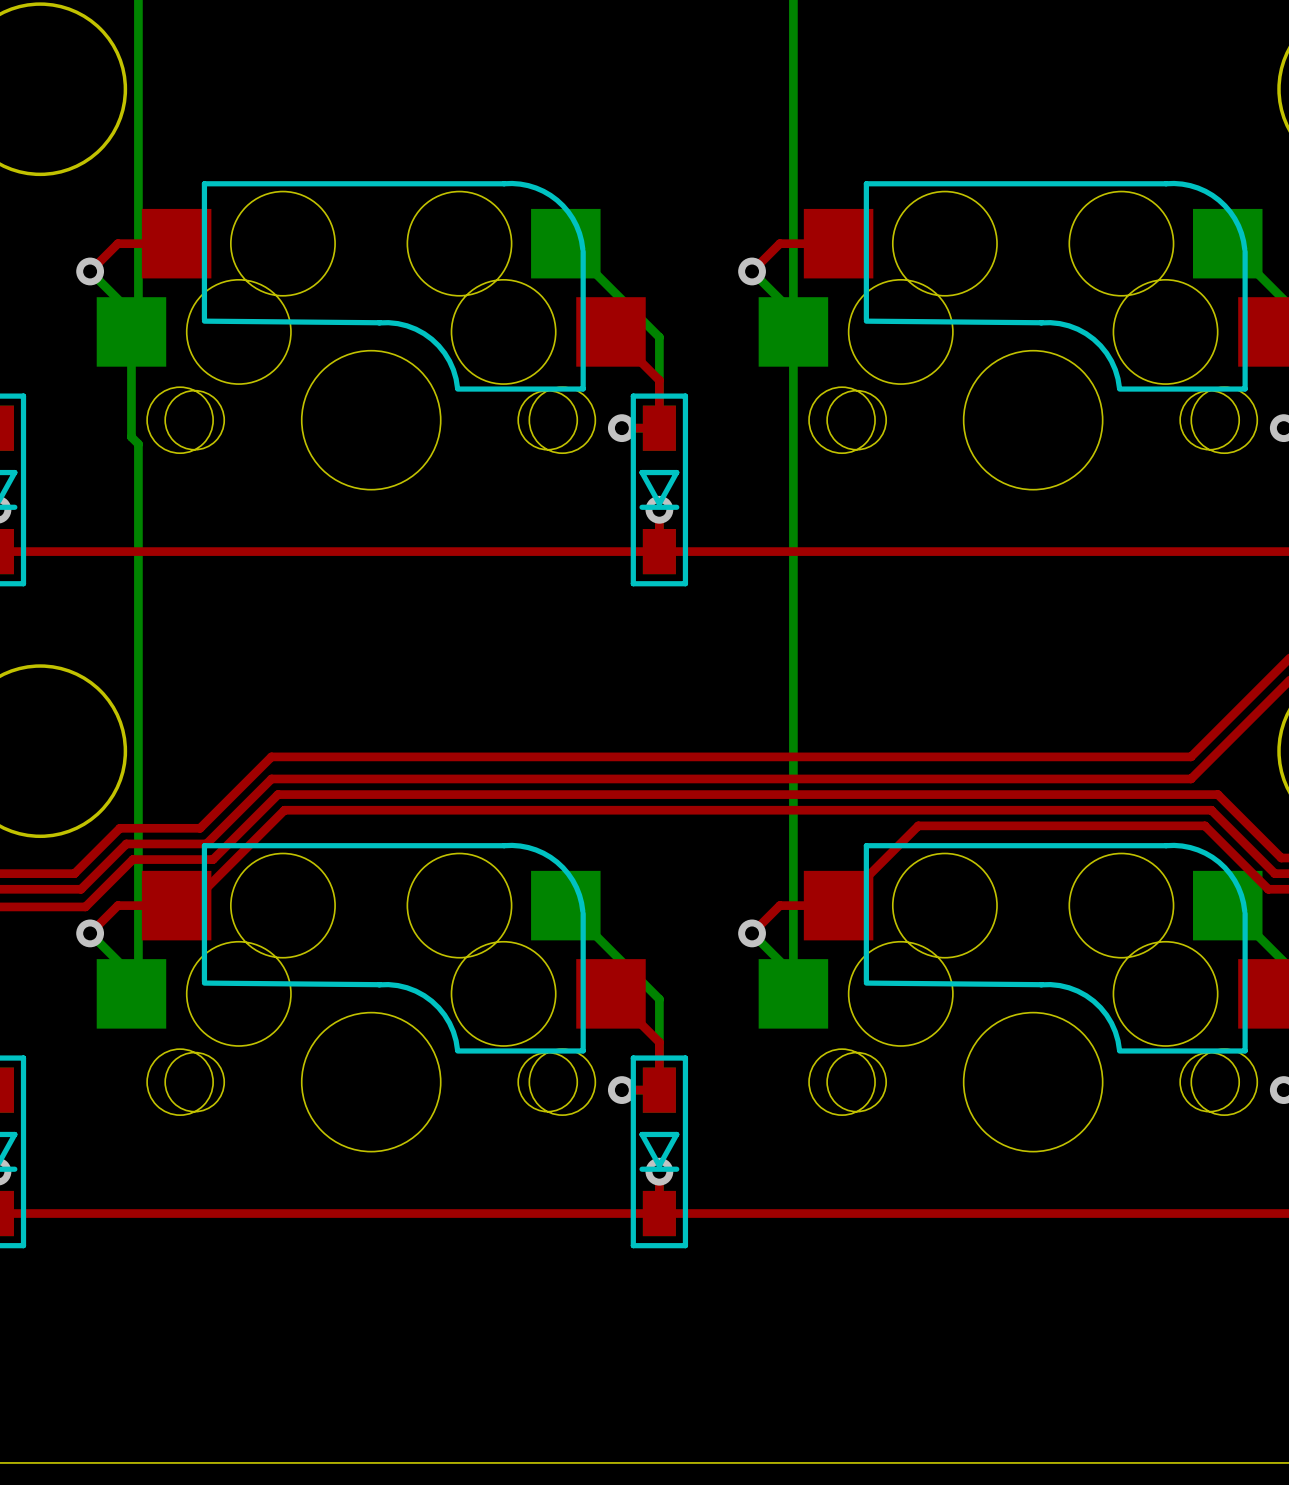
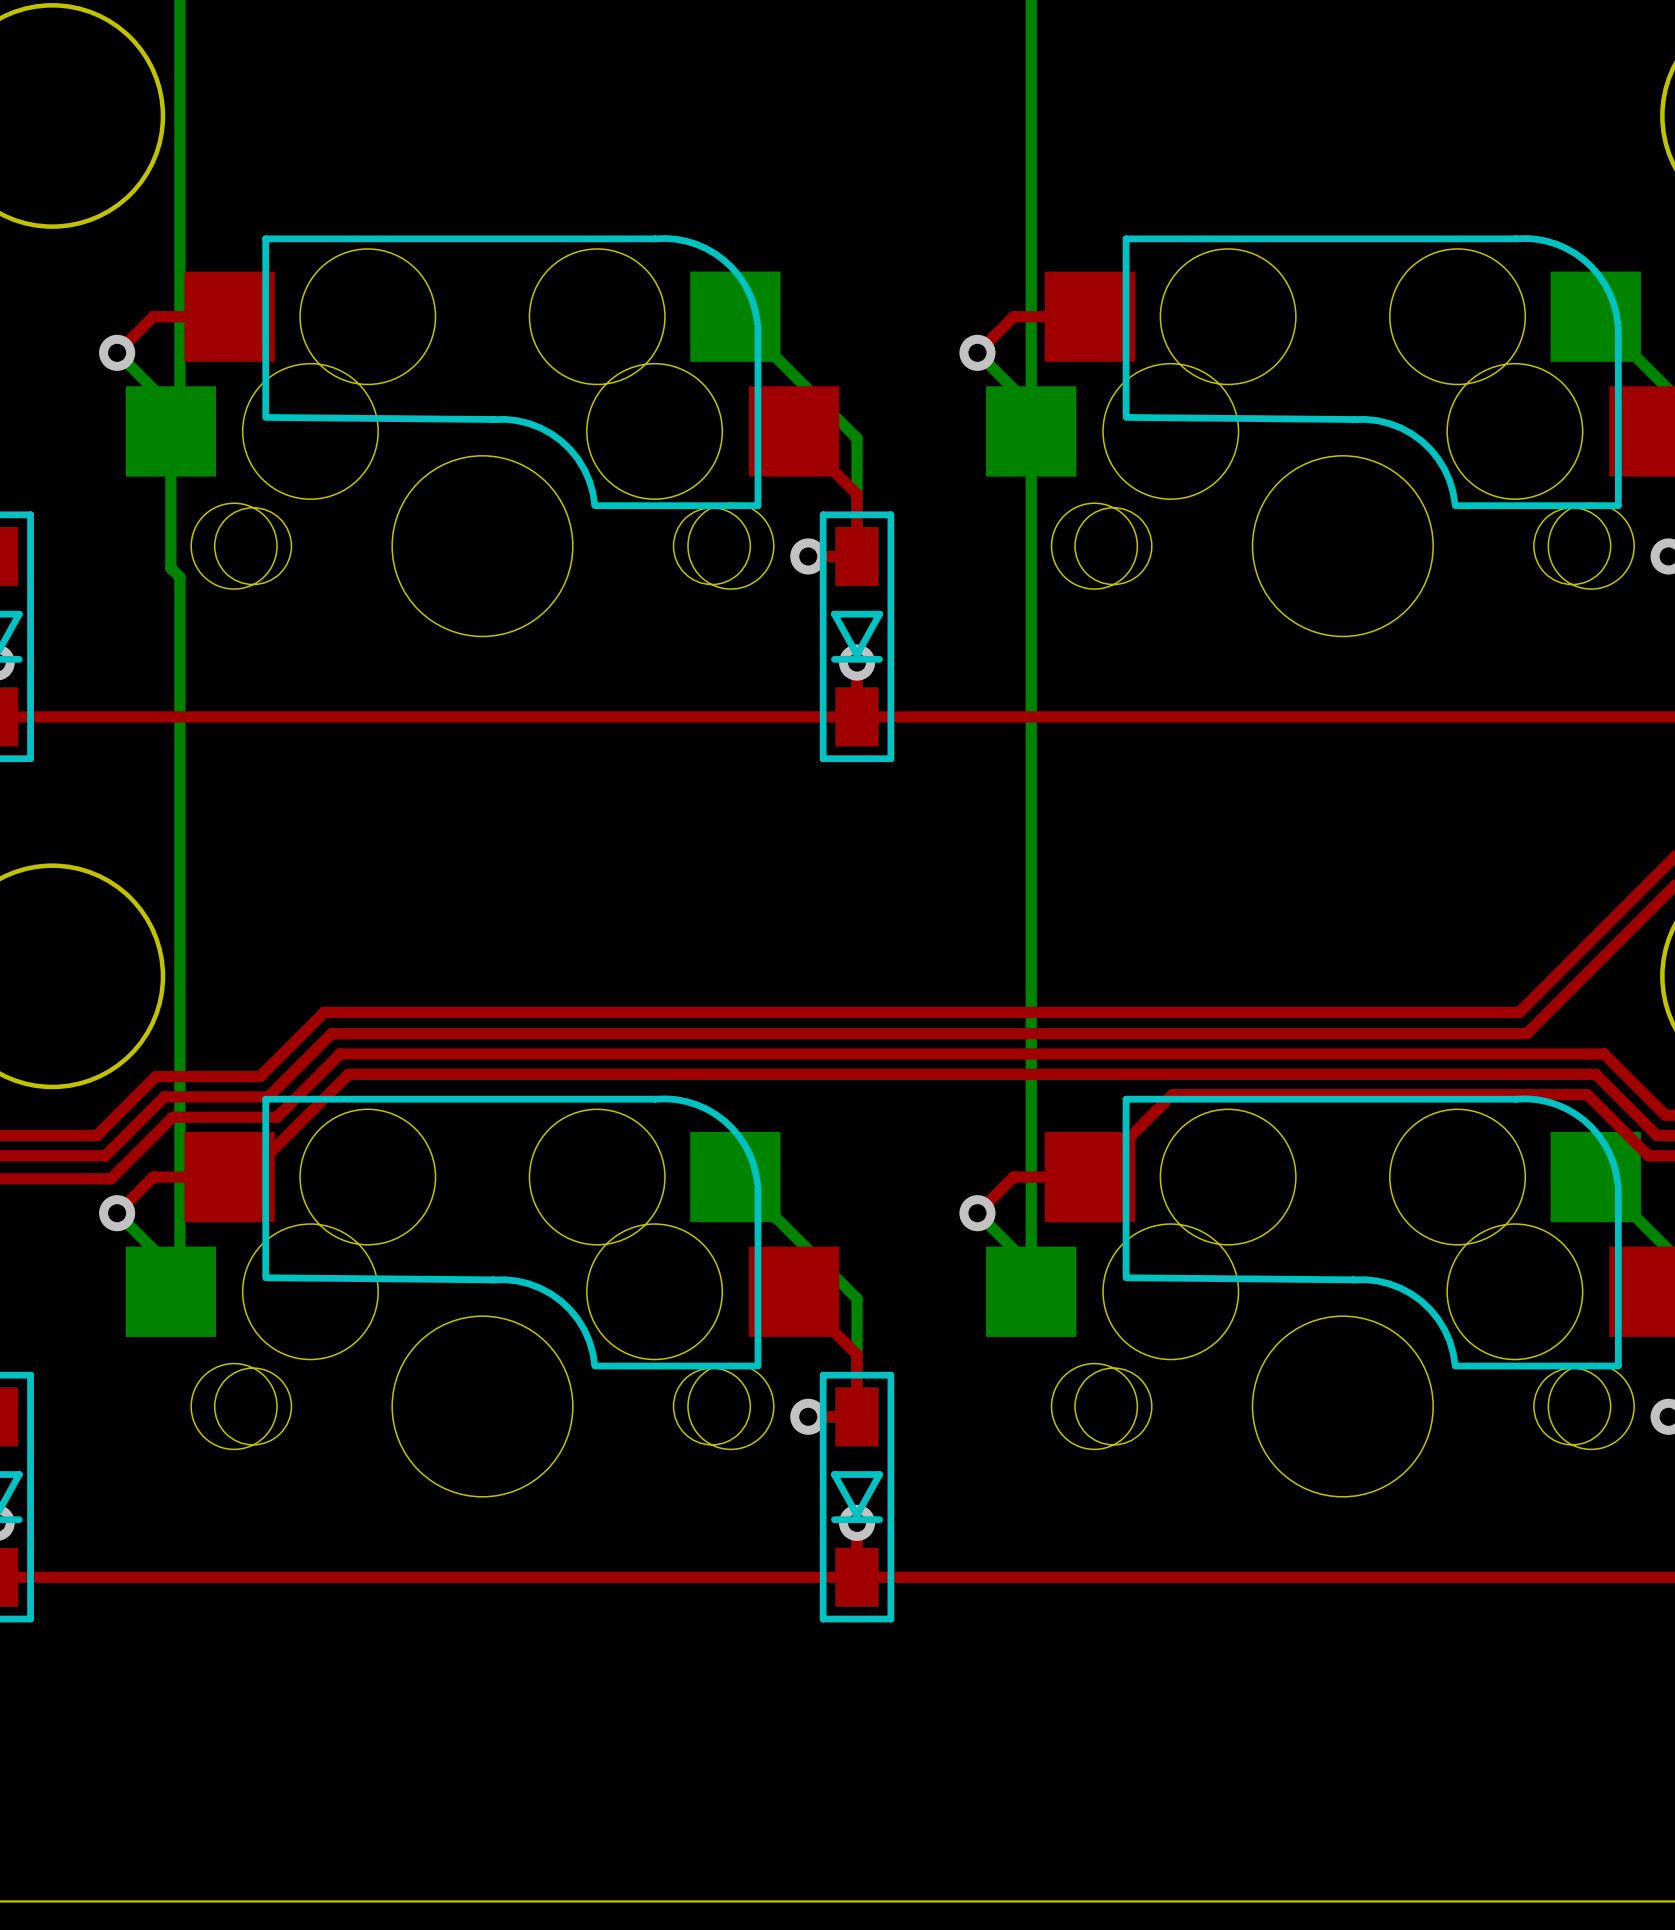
top track: (1191, 756) (271, 756) (249, 778) -> none
top track: (271, 778) (255, 795) -> (352, 1012) (324, 1012)
top track: (1168, 778) (1191, 778) -> (1519, 1012) (1548, 983)
top track: none -> (1548, 1012) (1526, 1033) (331, 1033)
top track: (261, 810) (278, 794) (1217, 794) (1234, 810) -> (340, 1053) (1604, 1053)
top track: (268, 826) (284, 810) (1211, 810) (1227, 826) -> (348, 1074) (1595, 1074)
top track: (901, 842) (918, 825) (1204, 825) (1221, 842) -> (1172, 1094) (1587, 1094)

